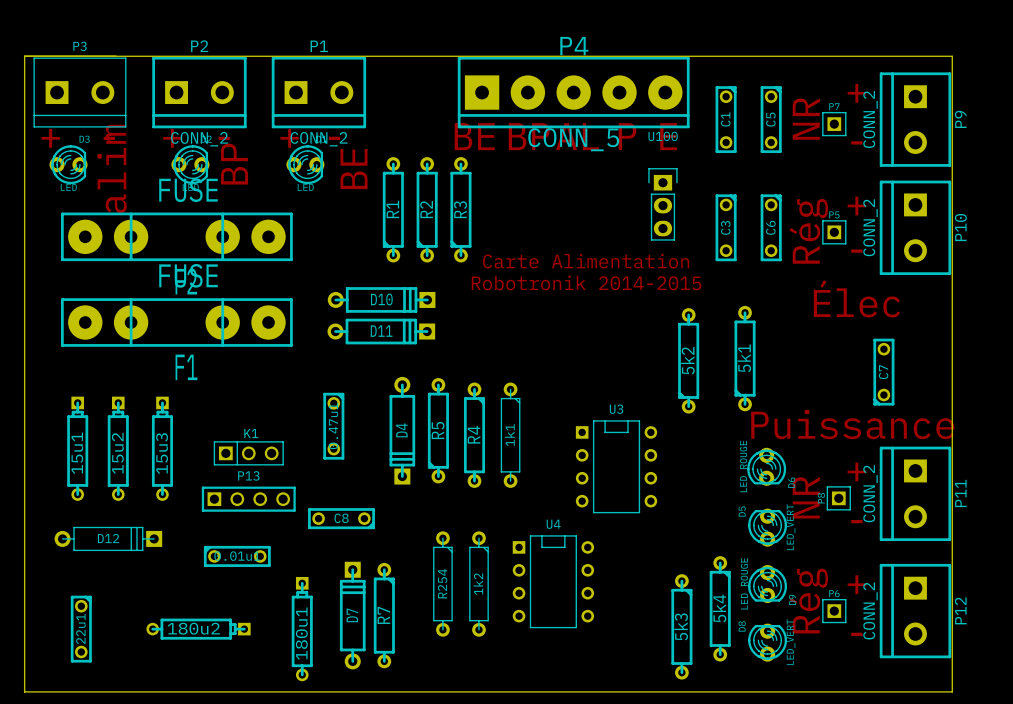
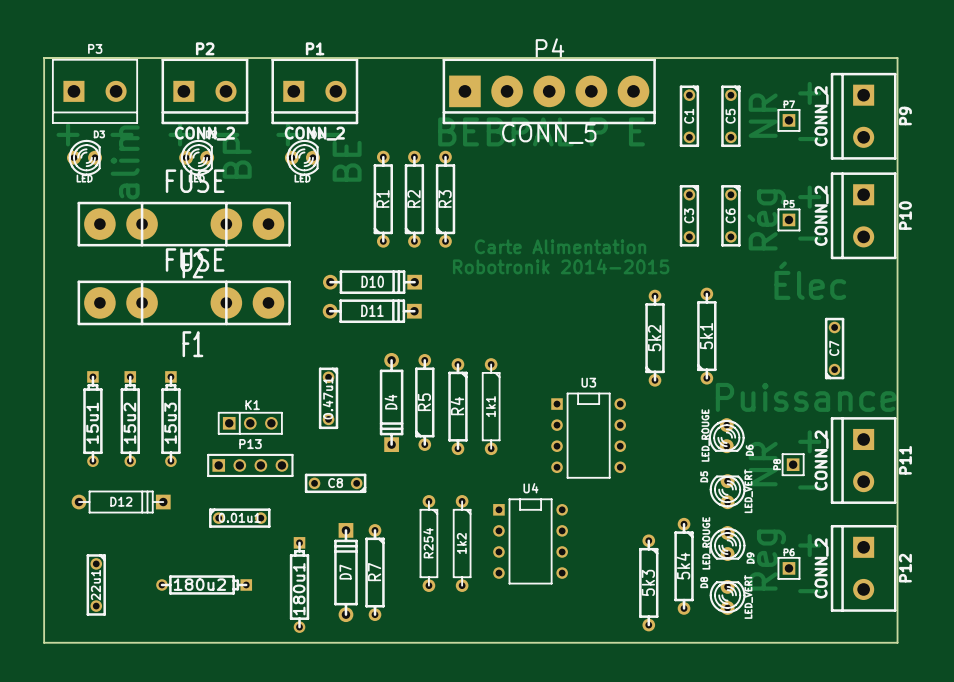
U100: (662, 204) -> none

